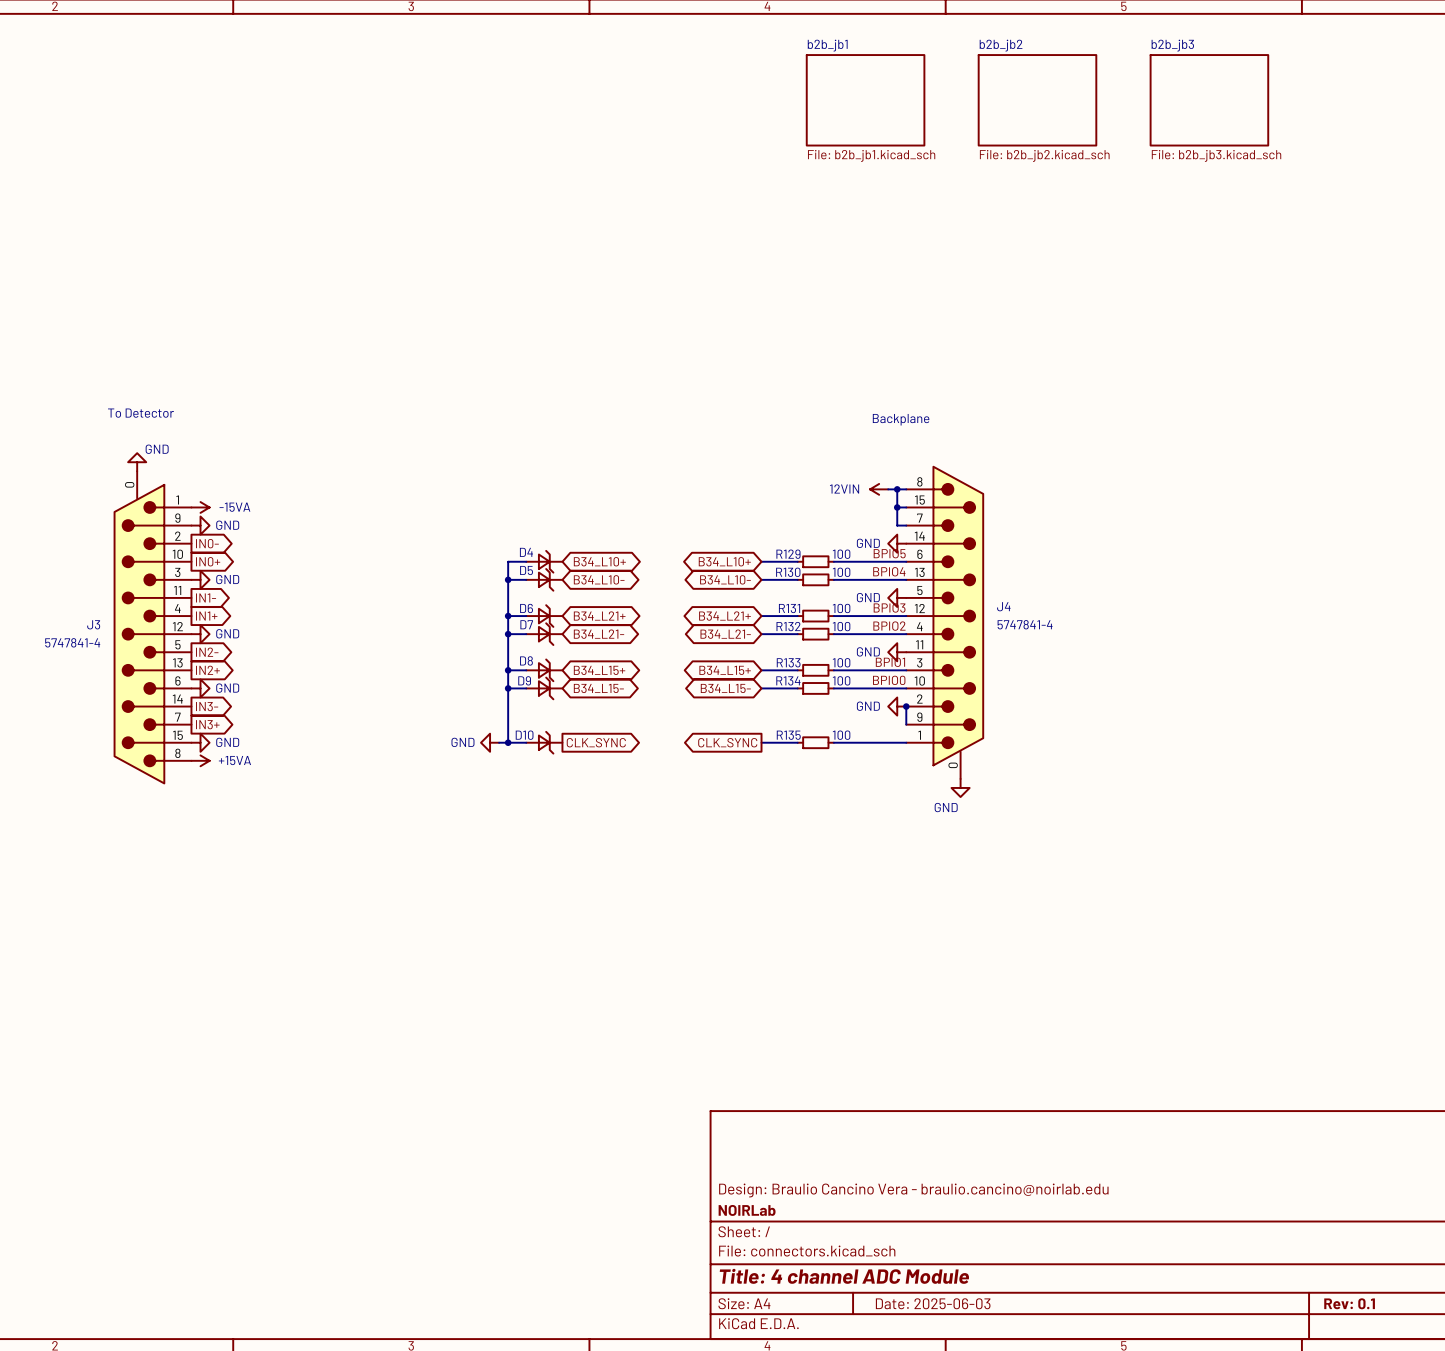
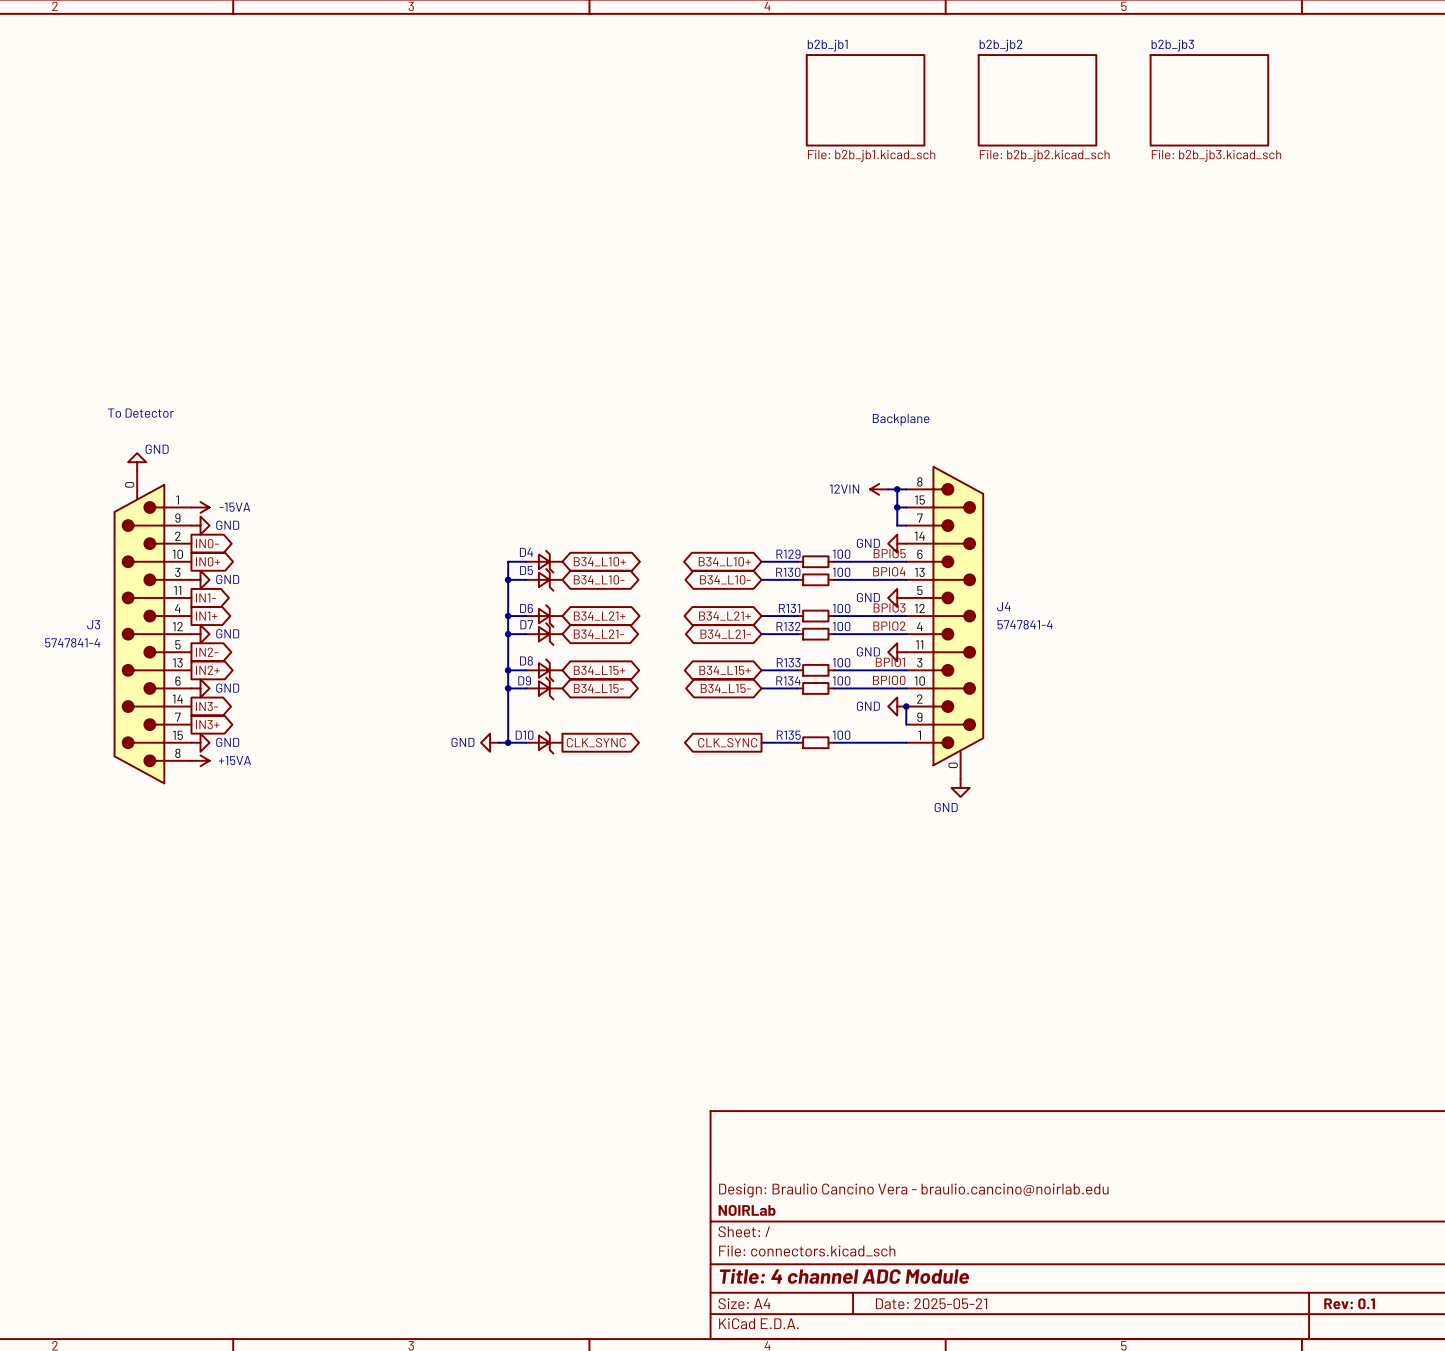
title block: Date: 2025-06-03 (933, 1303) -> Date: 2025-05-21 (931, 1303)

